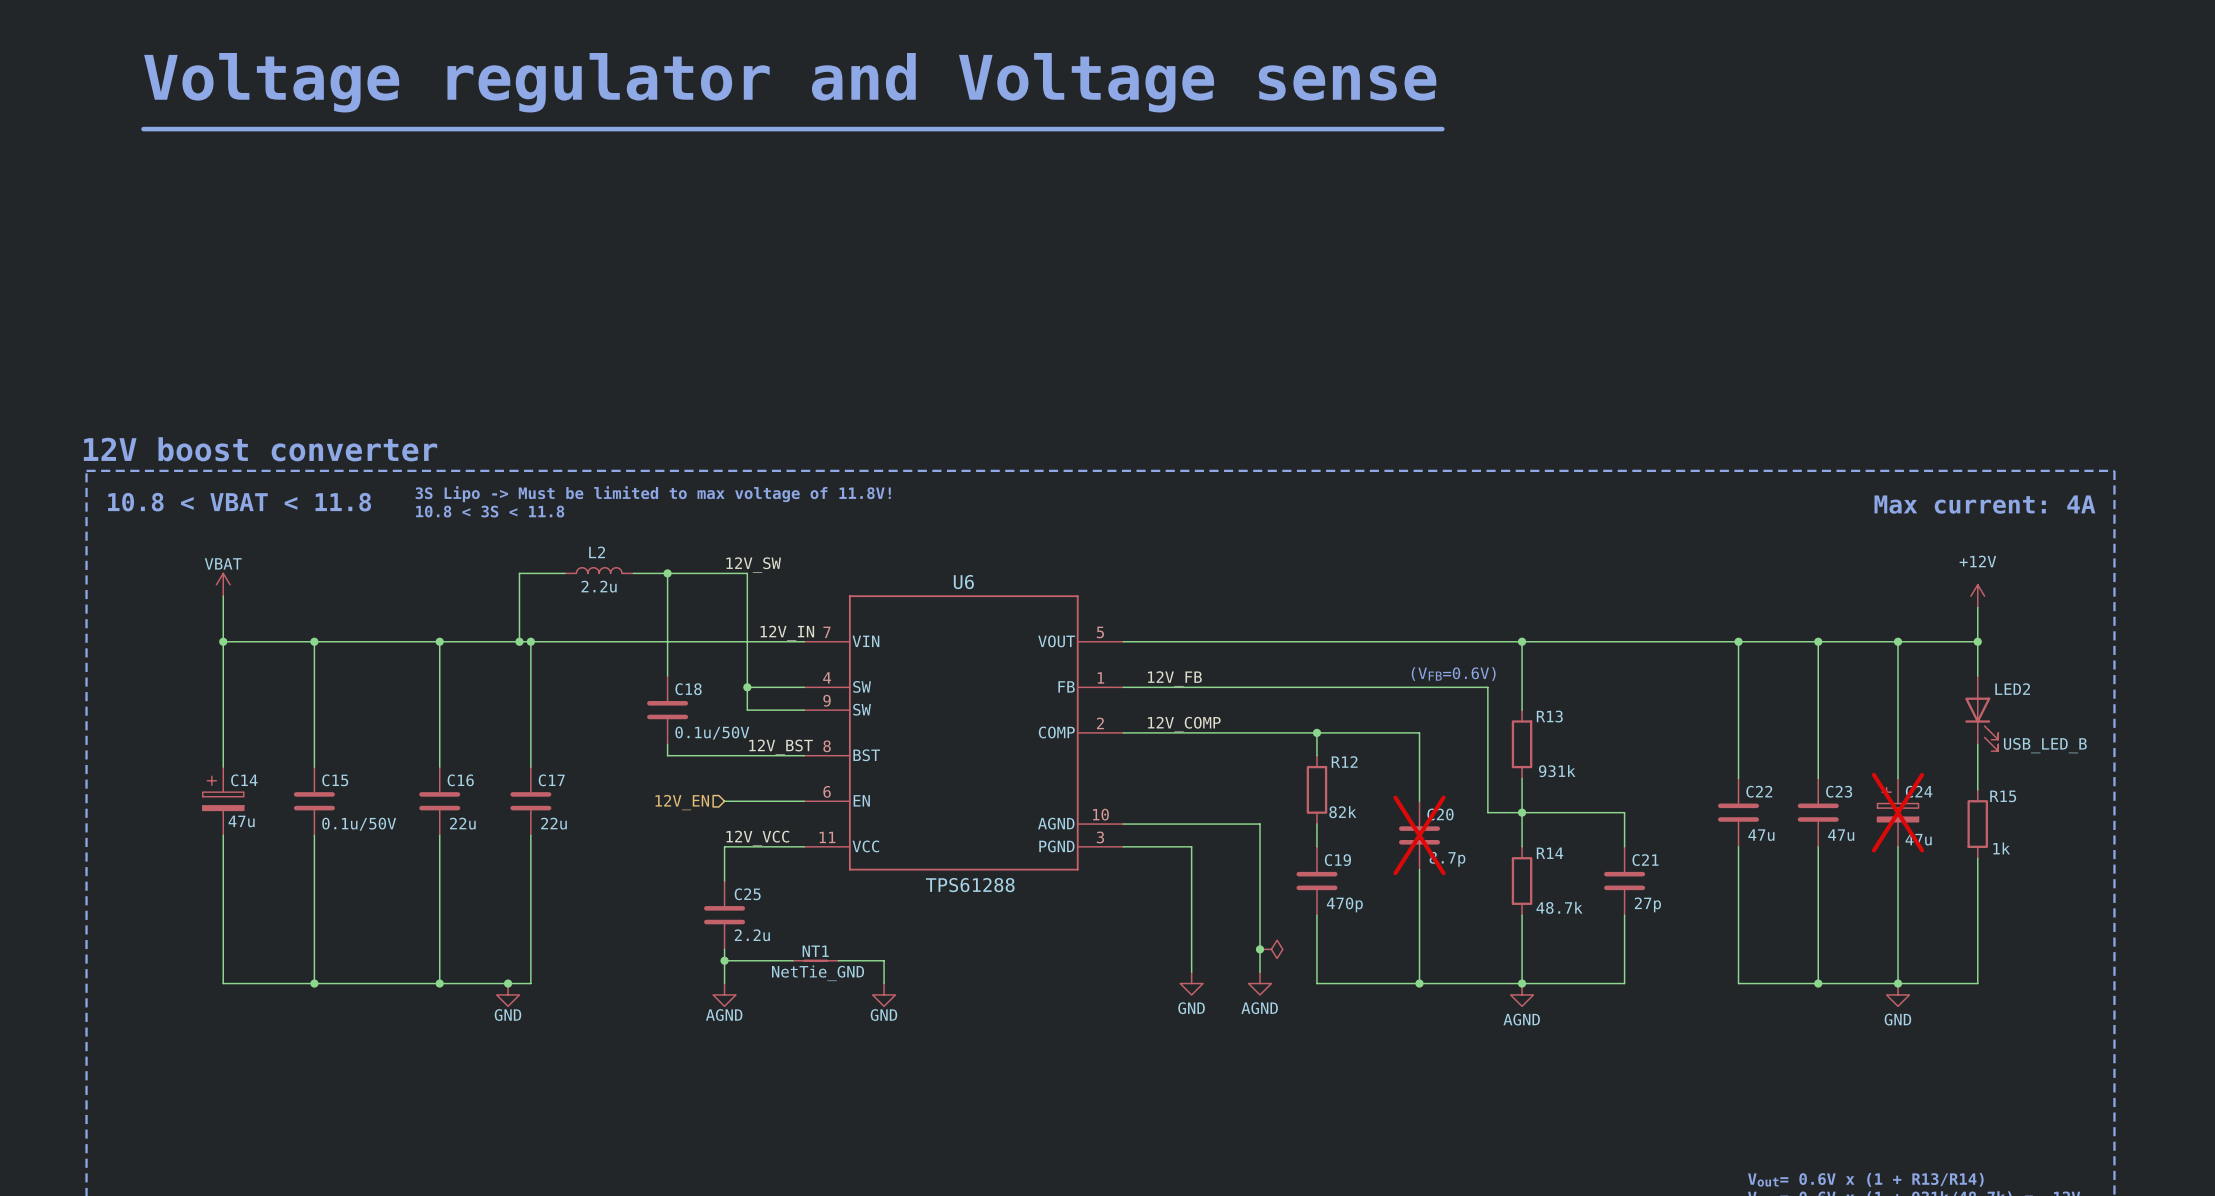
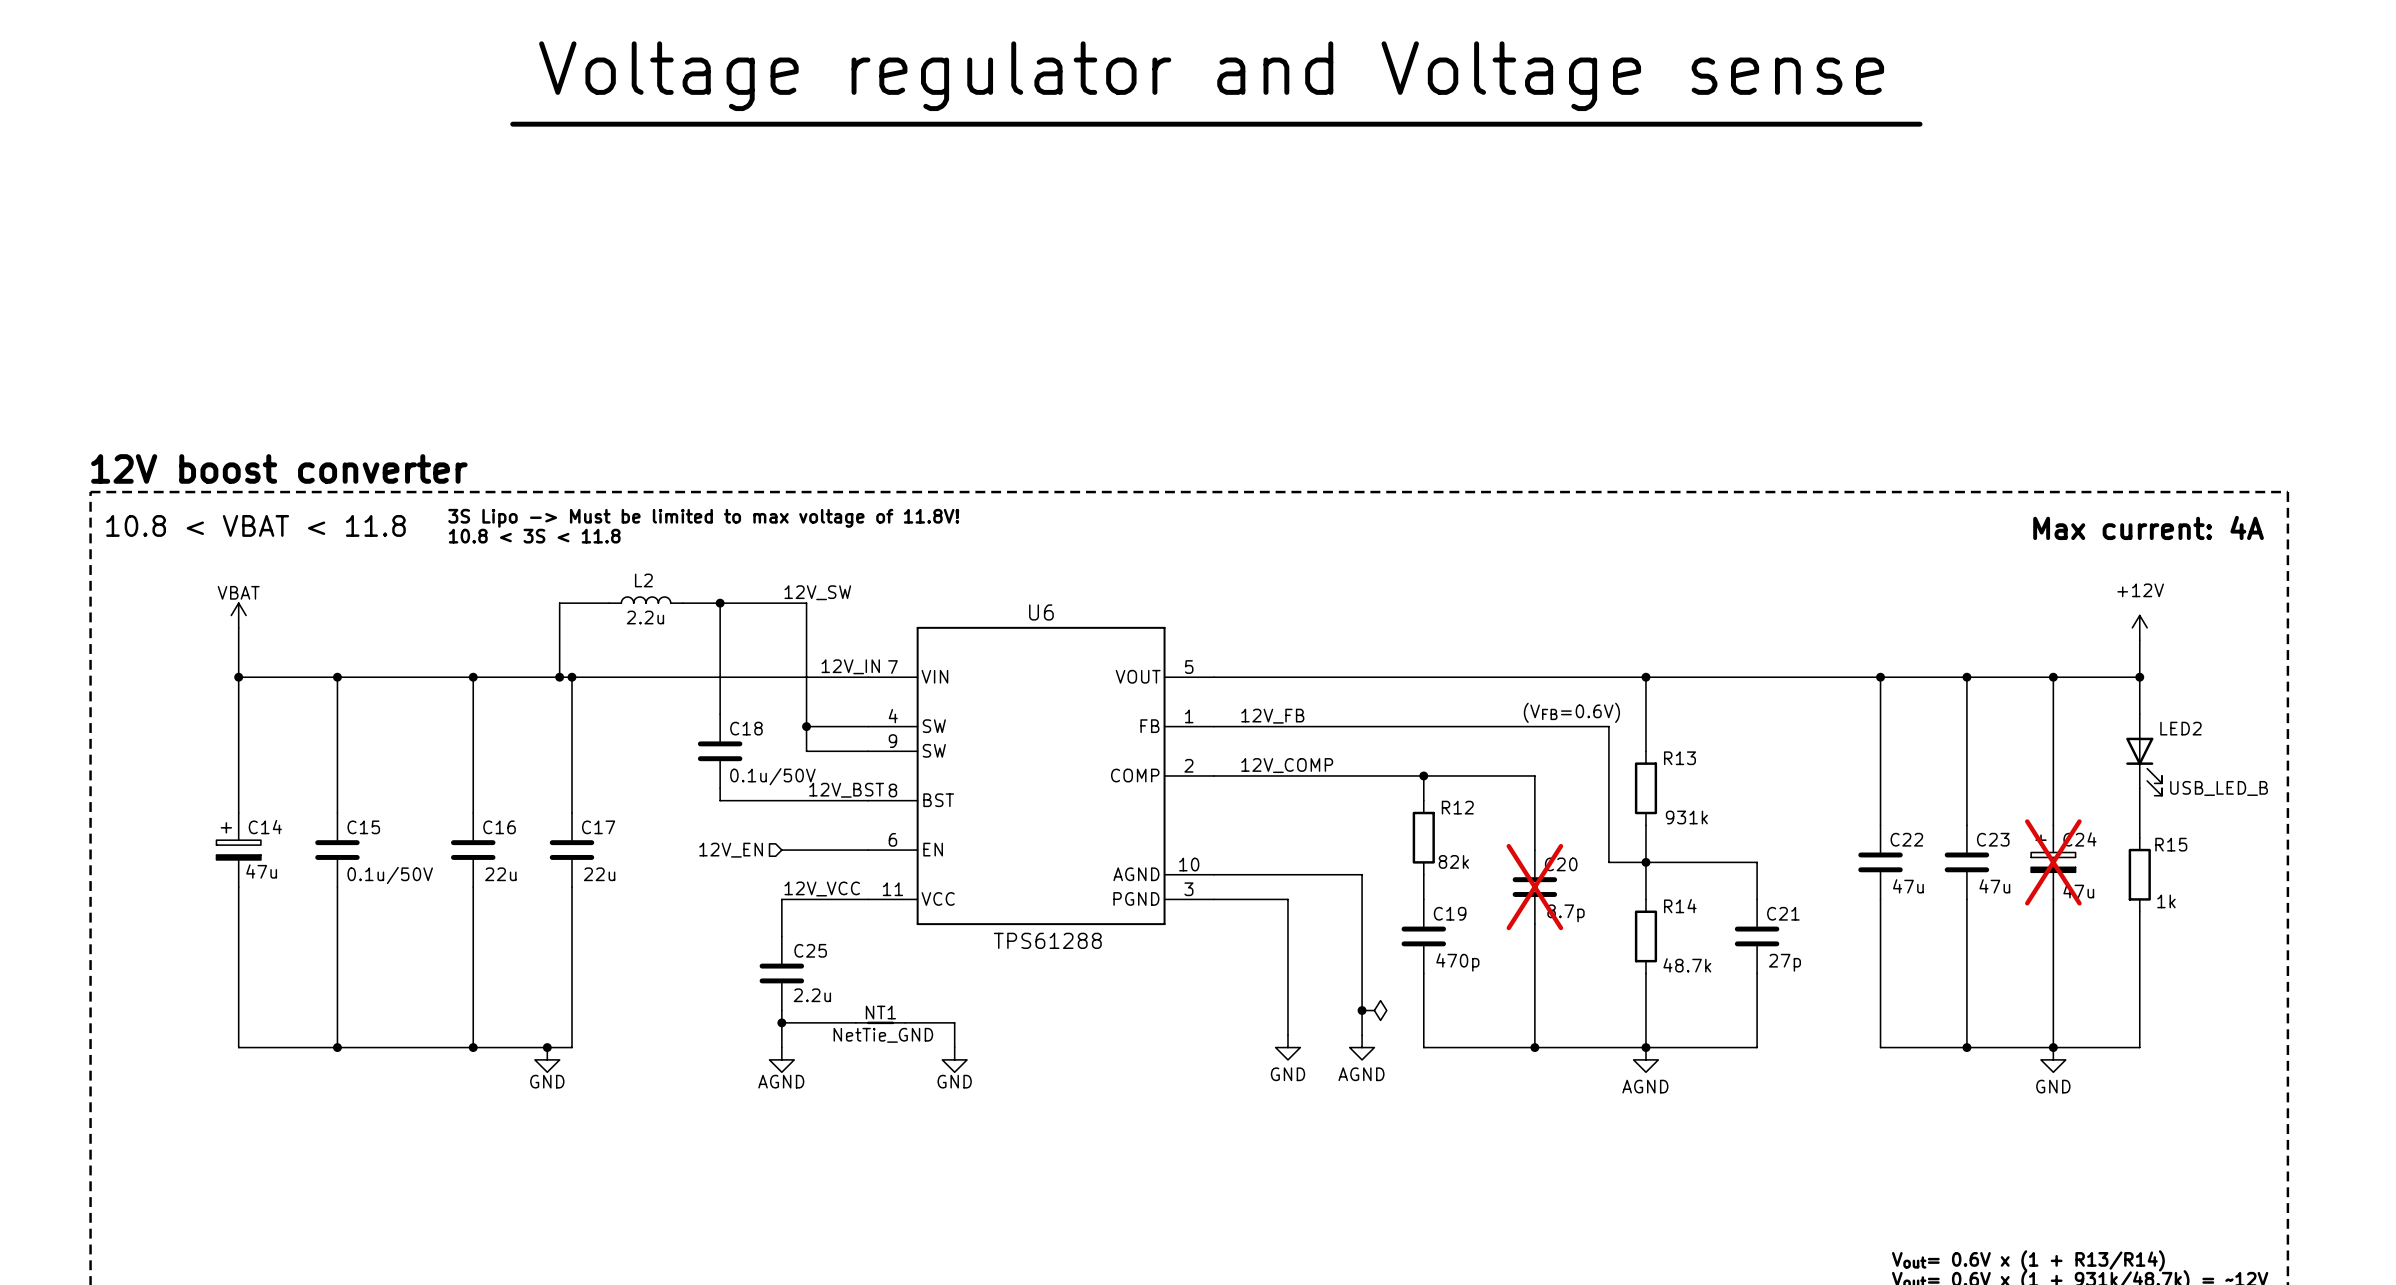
text: Voltage regulator and Voltage sense (790, 82) -> none
text: none -> Voltage regulator and Voltage sense (1211, 76)
line: (143, 129) (1442, 129) -> none
line: none -> (512, 124) (1920, 124)

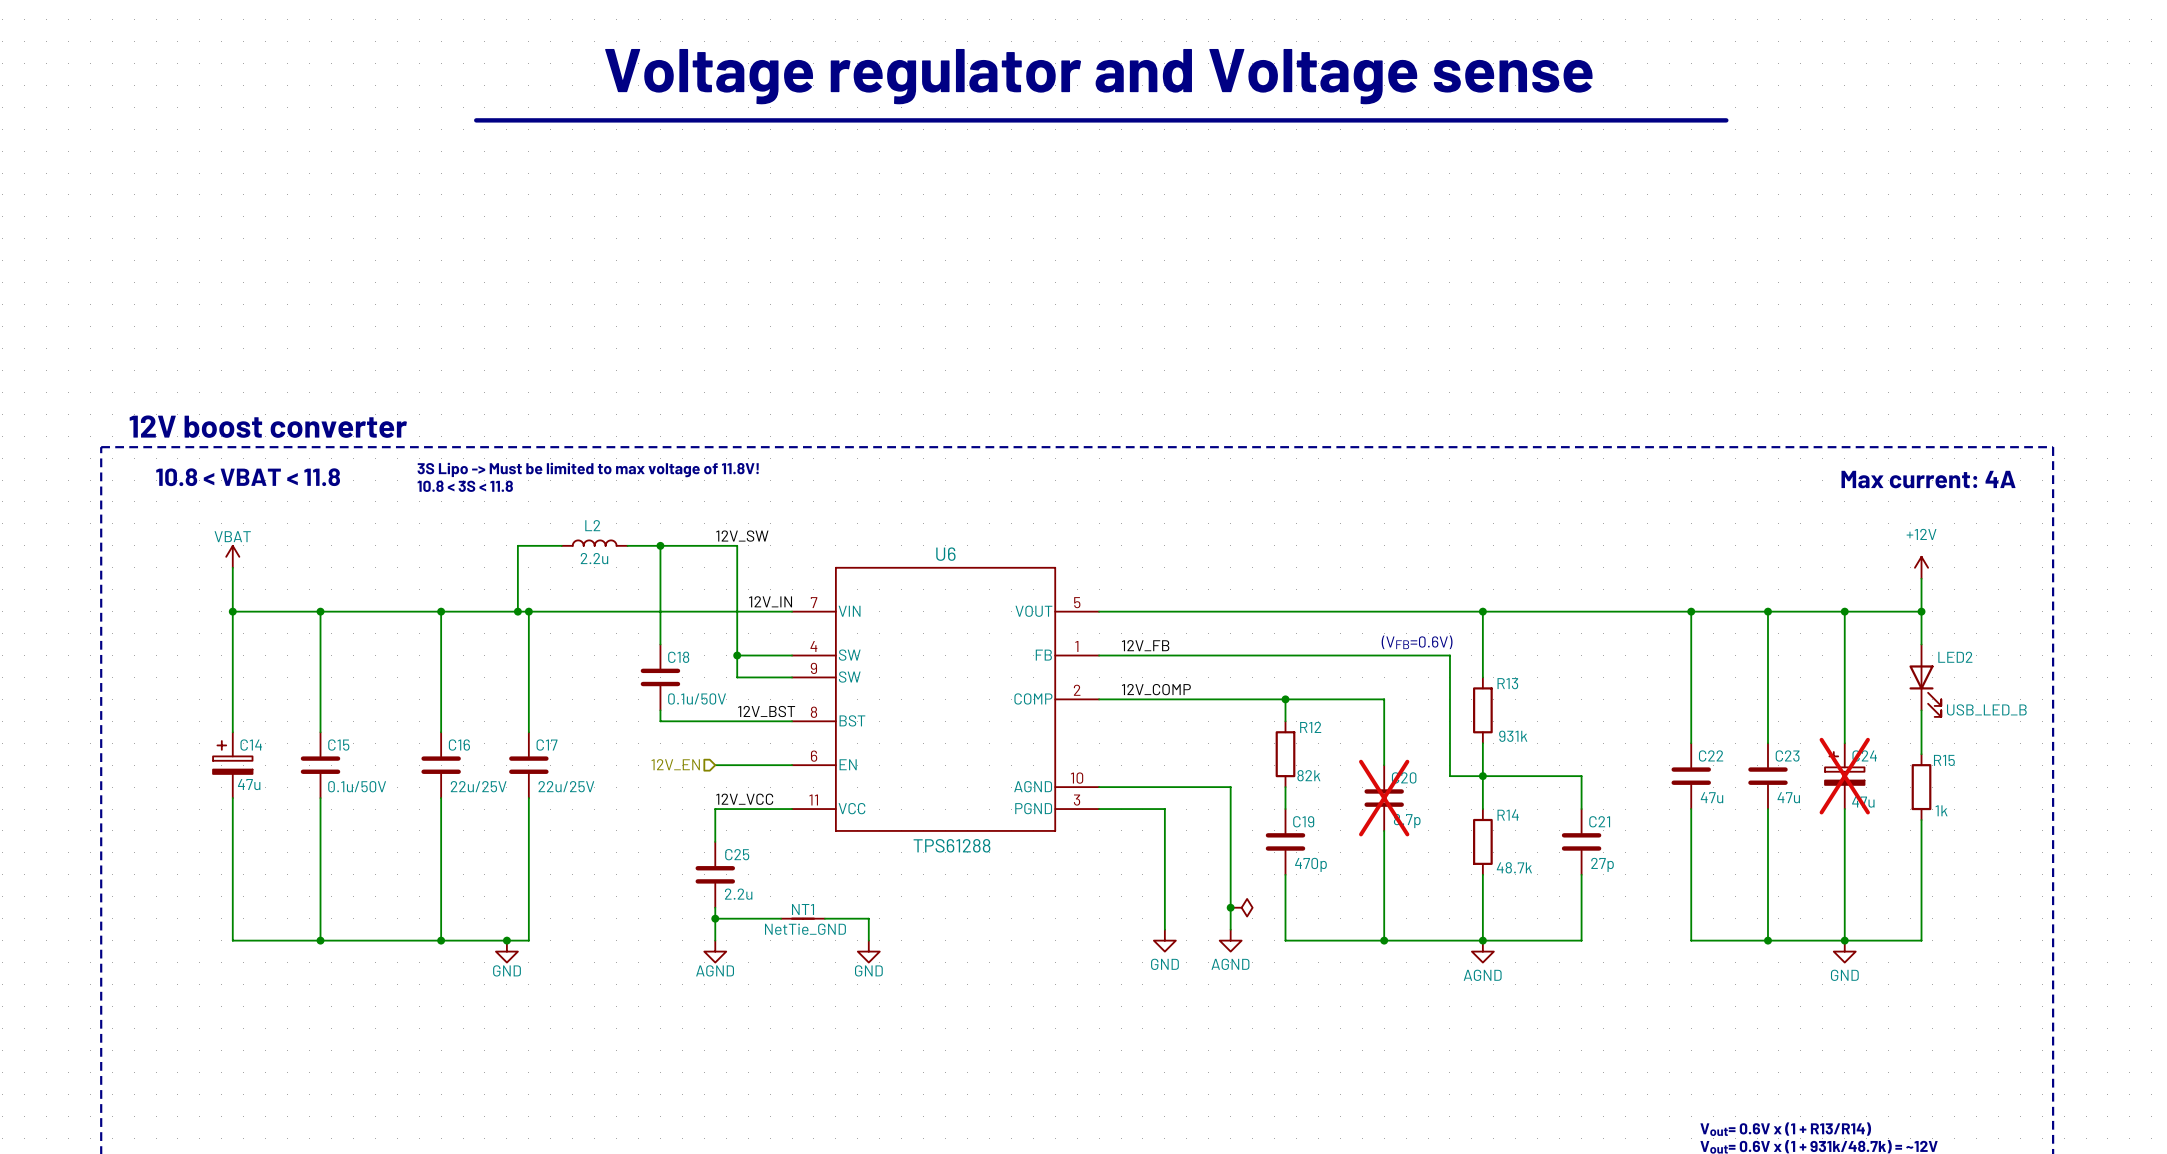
C16 value: 22u (500, 874) -> 22u/25V (478, 786)
C17 value: 22u (599, 874) -> 22u/25V (566, 786)

